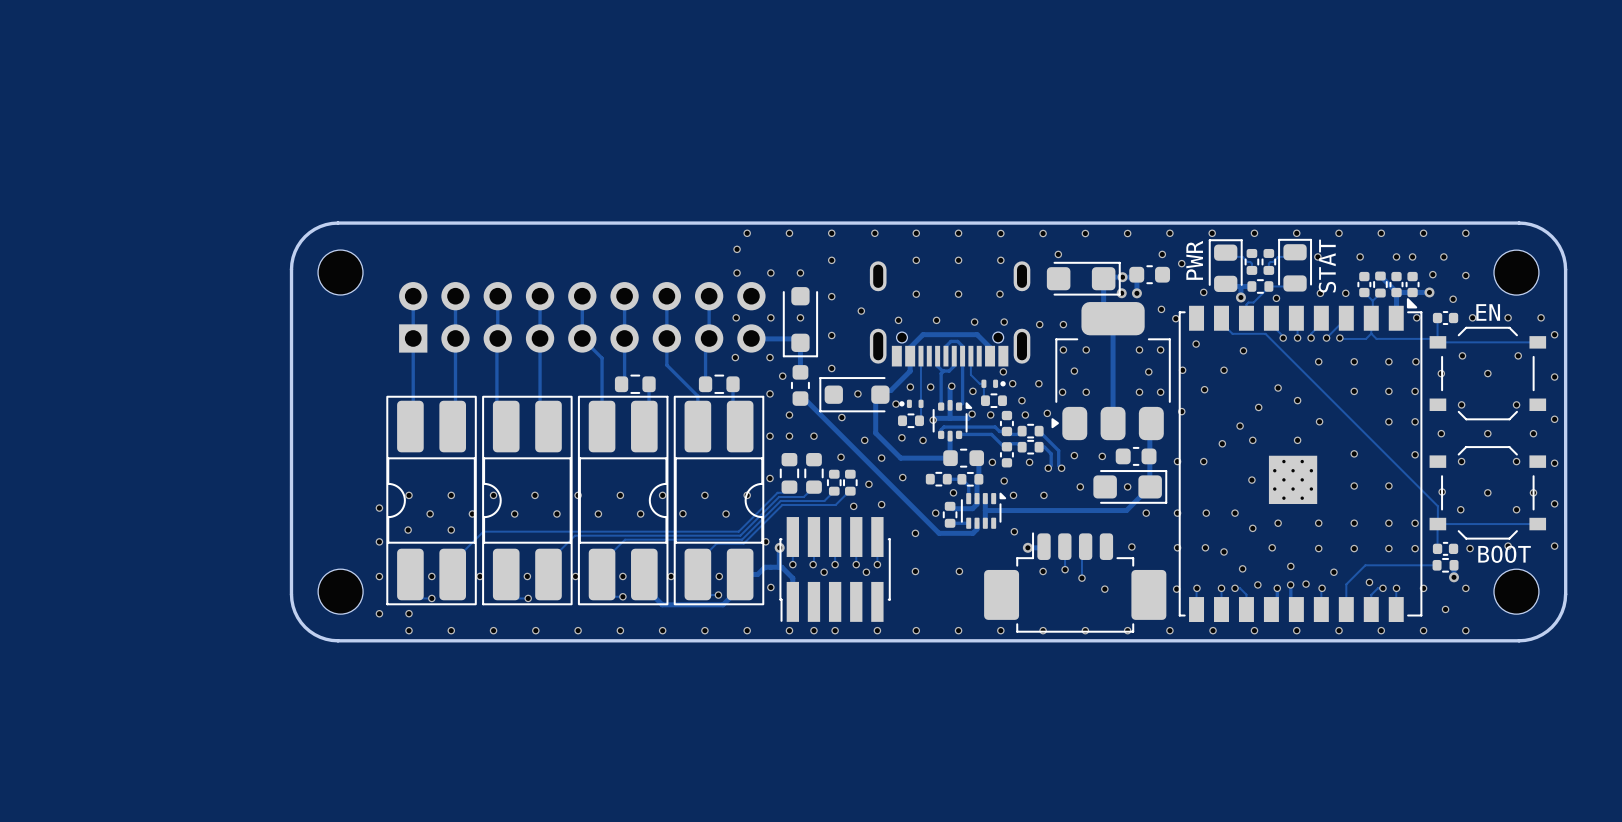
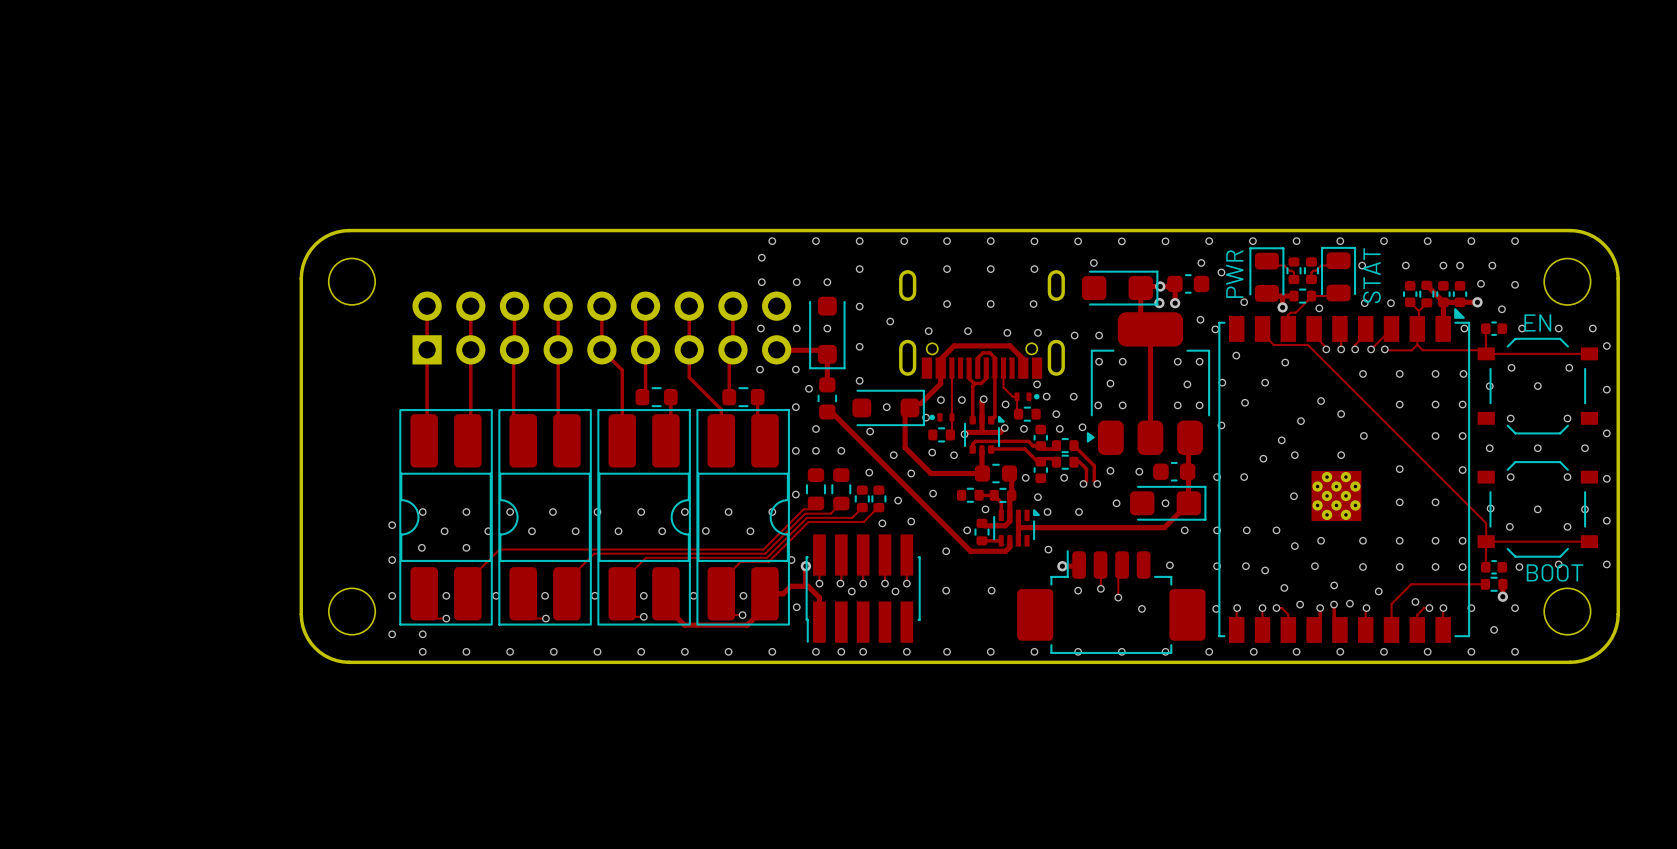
part rotation: 0° (854, 394) -> 180° (888, 407)

